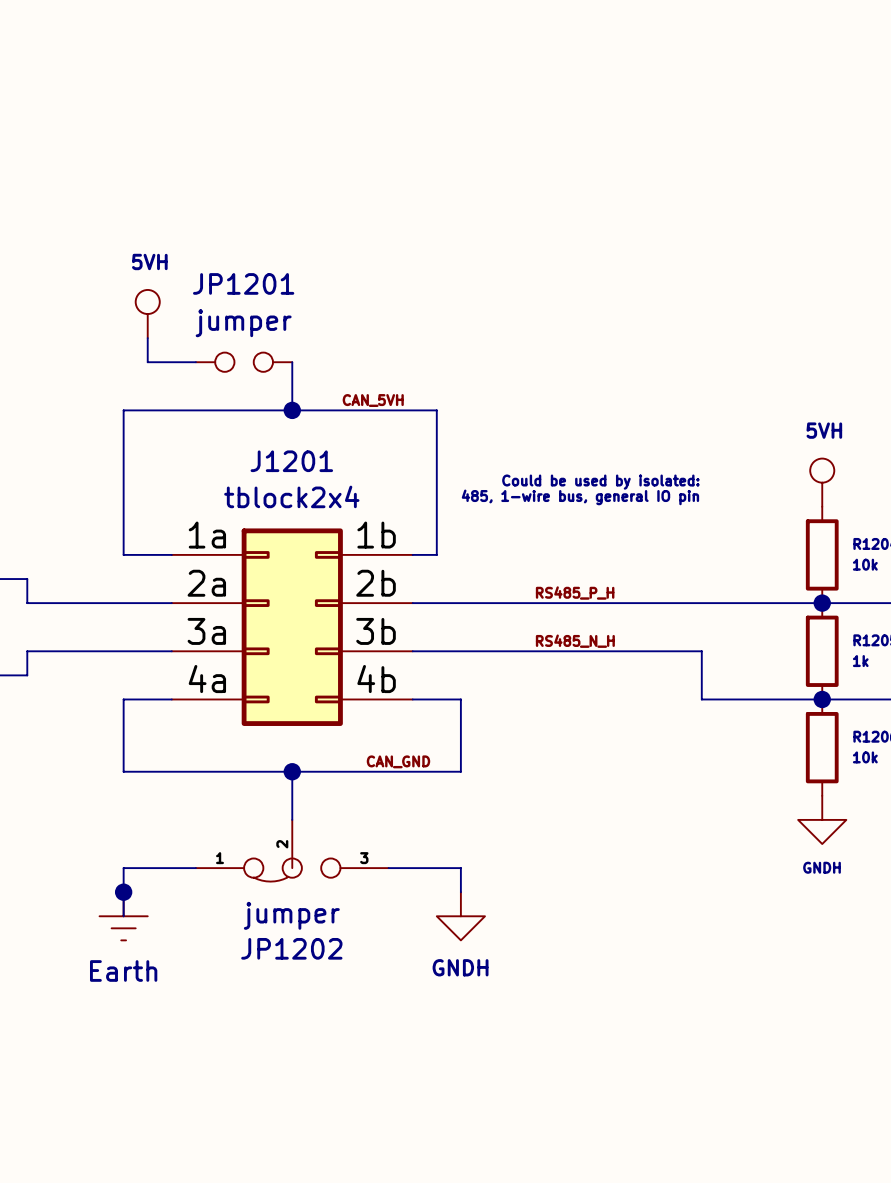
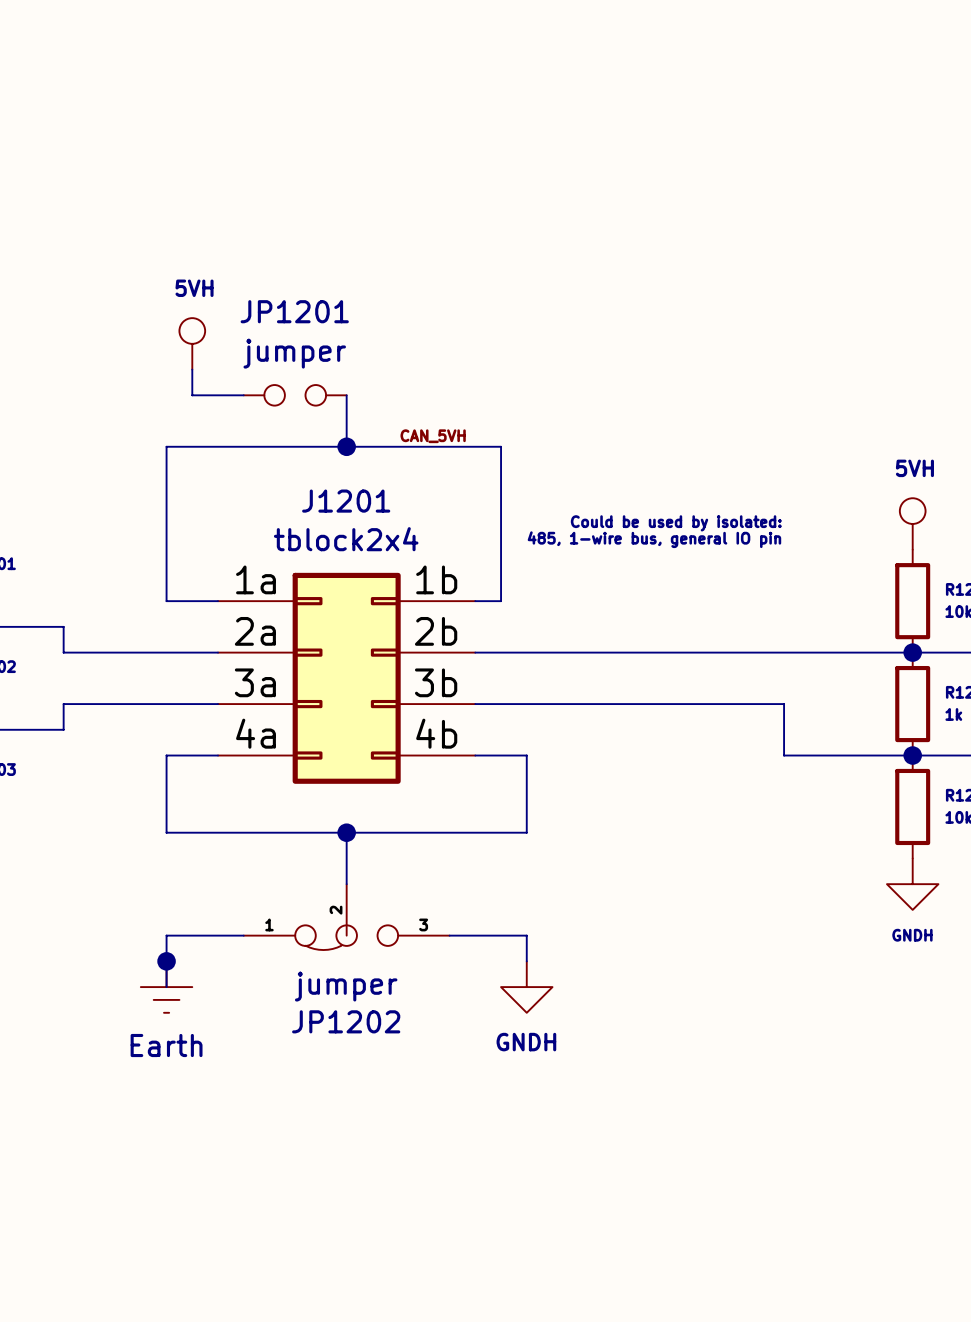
label: RS485_P_H (575, 593) -> none
label: RS485_N_H (575, 641) -> none
label: CAN_GND (398, 761) -> none

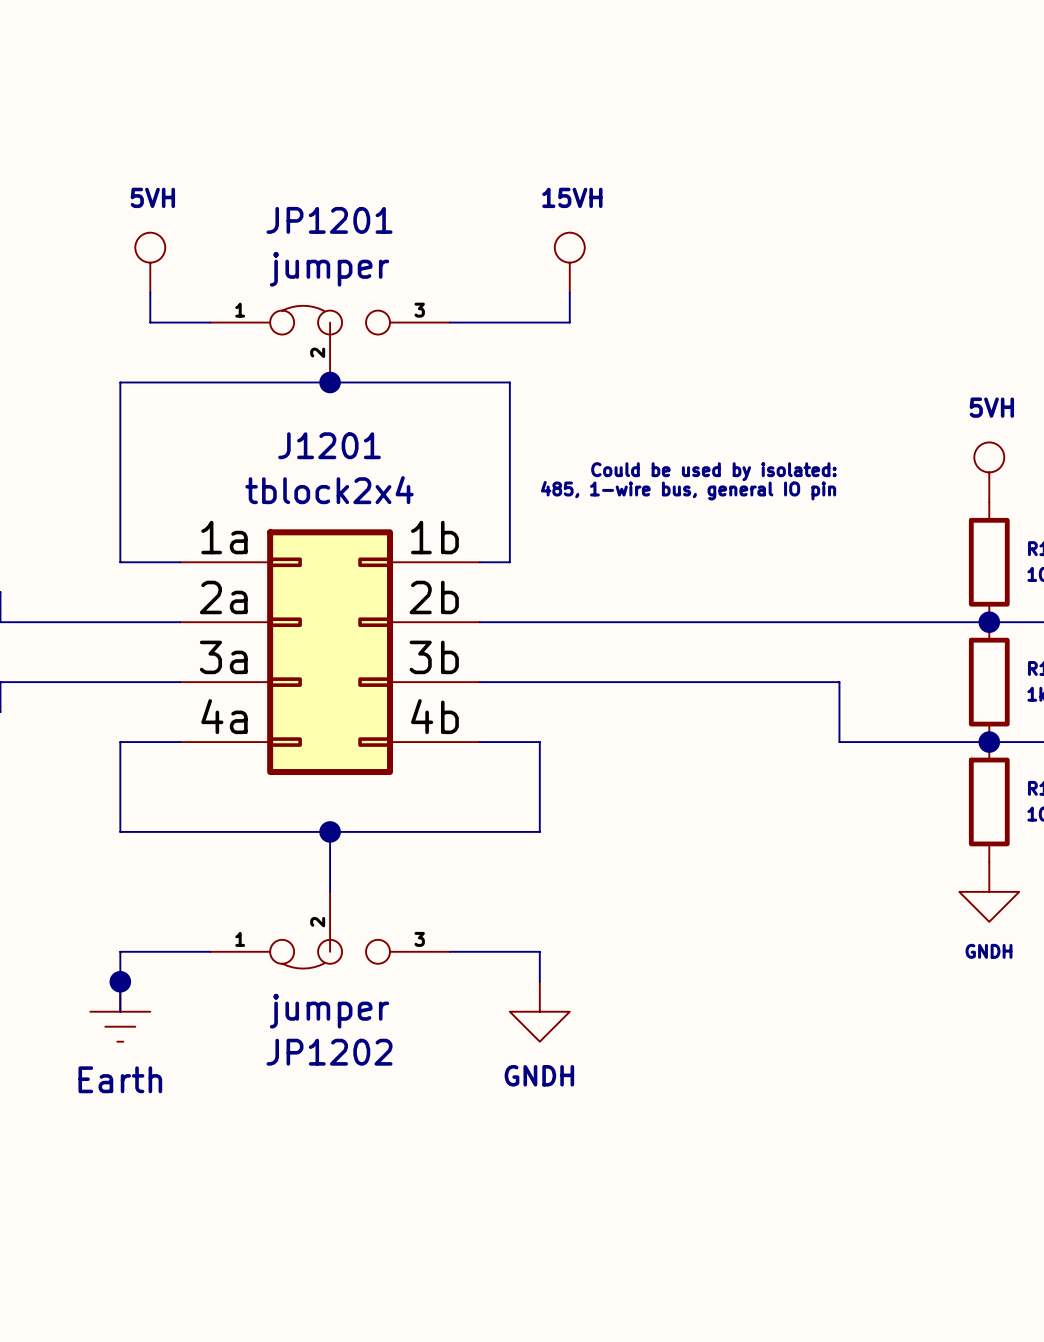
power symbol: none -> 15VH (569, 262)
wire: none -> (569, 292) (569, 322) (449, 322)
JP1201 symbol: [243, 385, 347, 406] -> [210, 305, 450, 383]
label: CAN_5VH (433, 436) -> none

